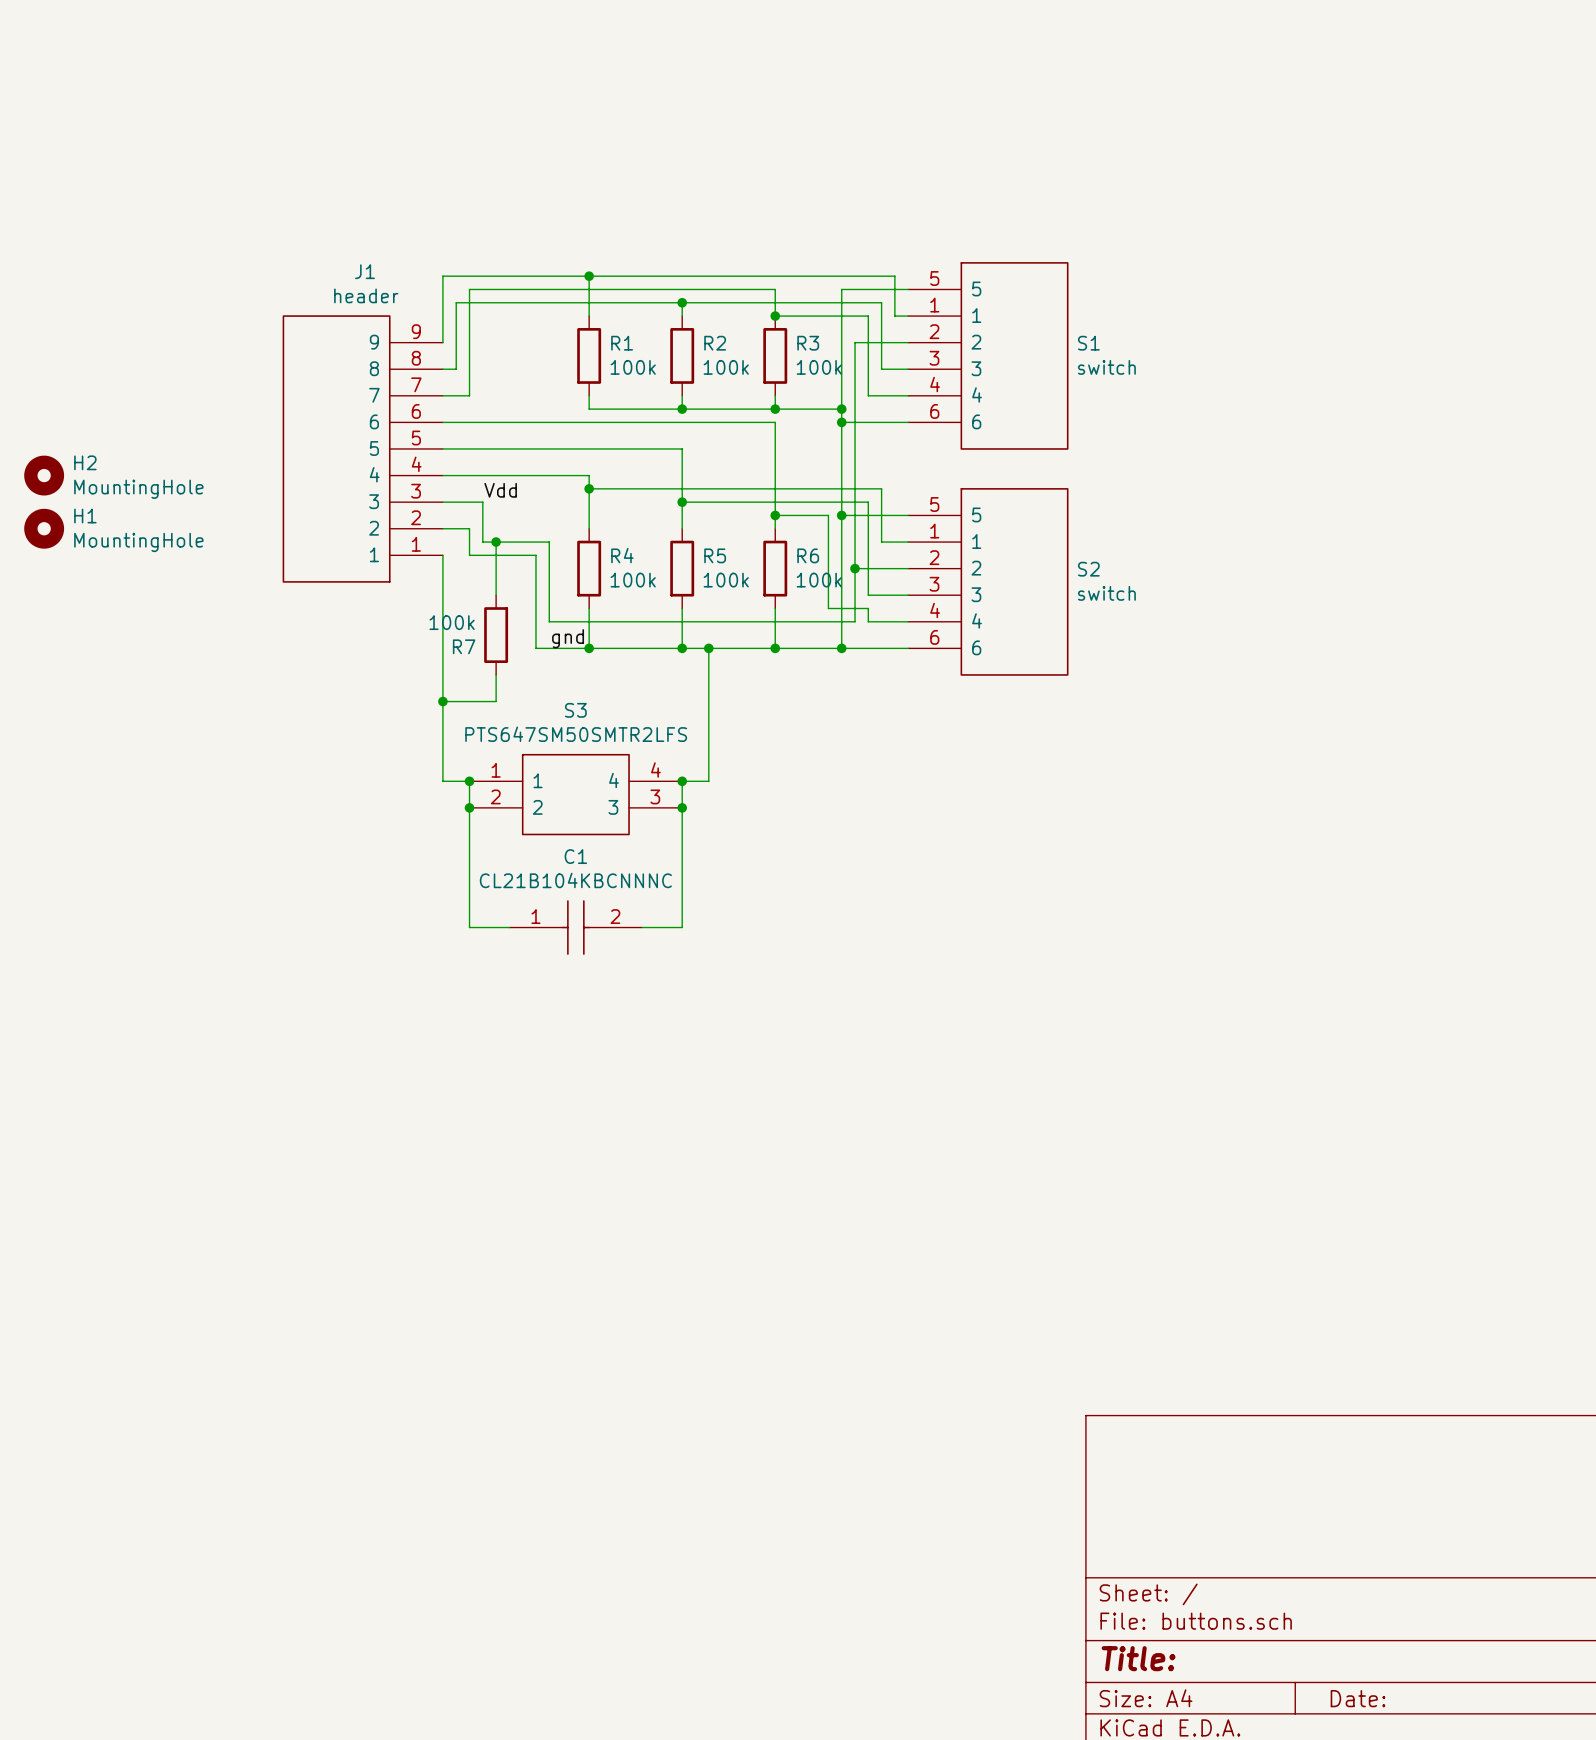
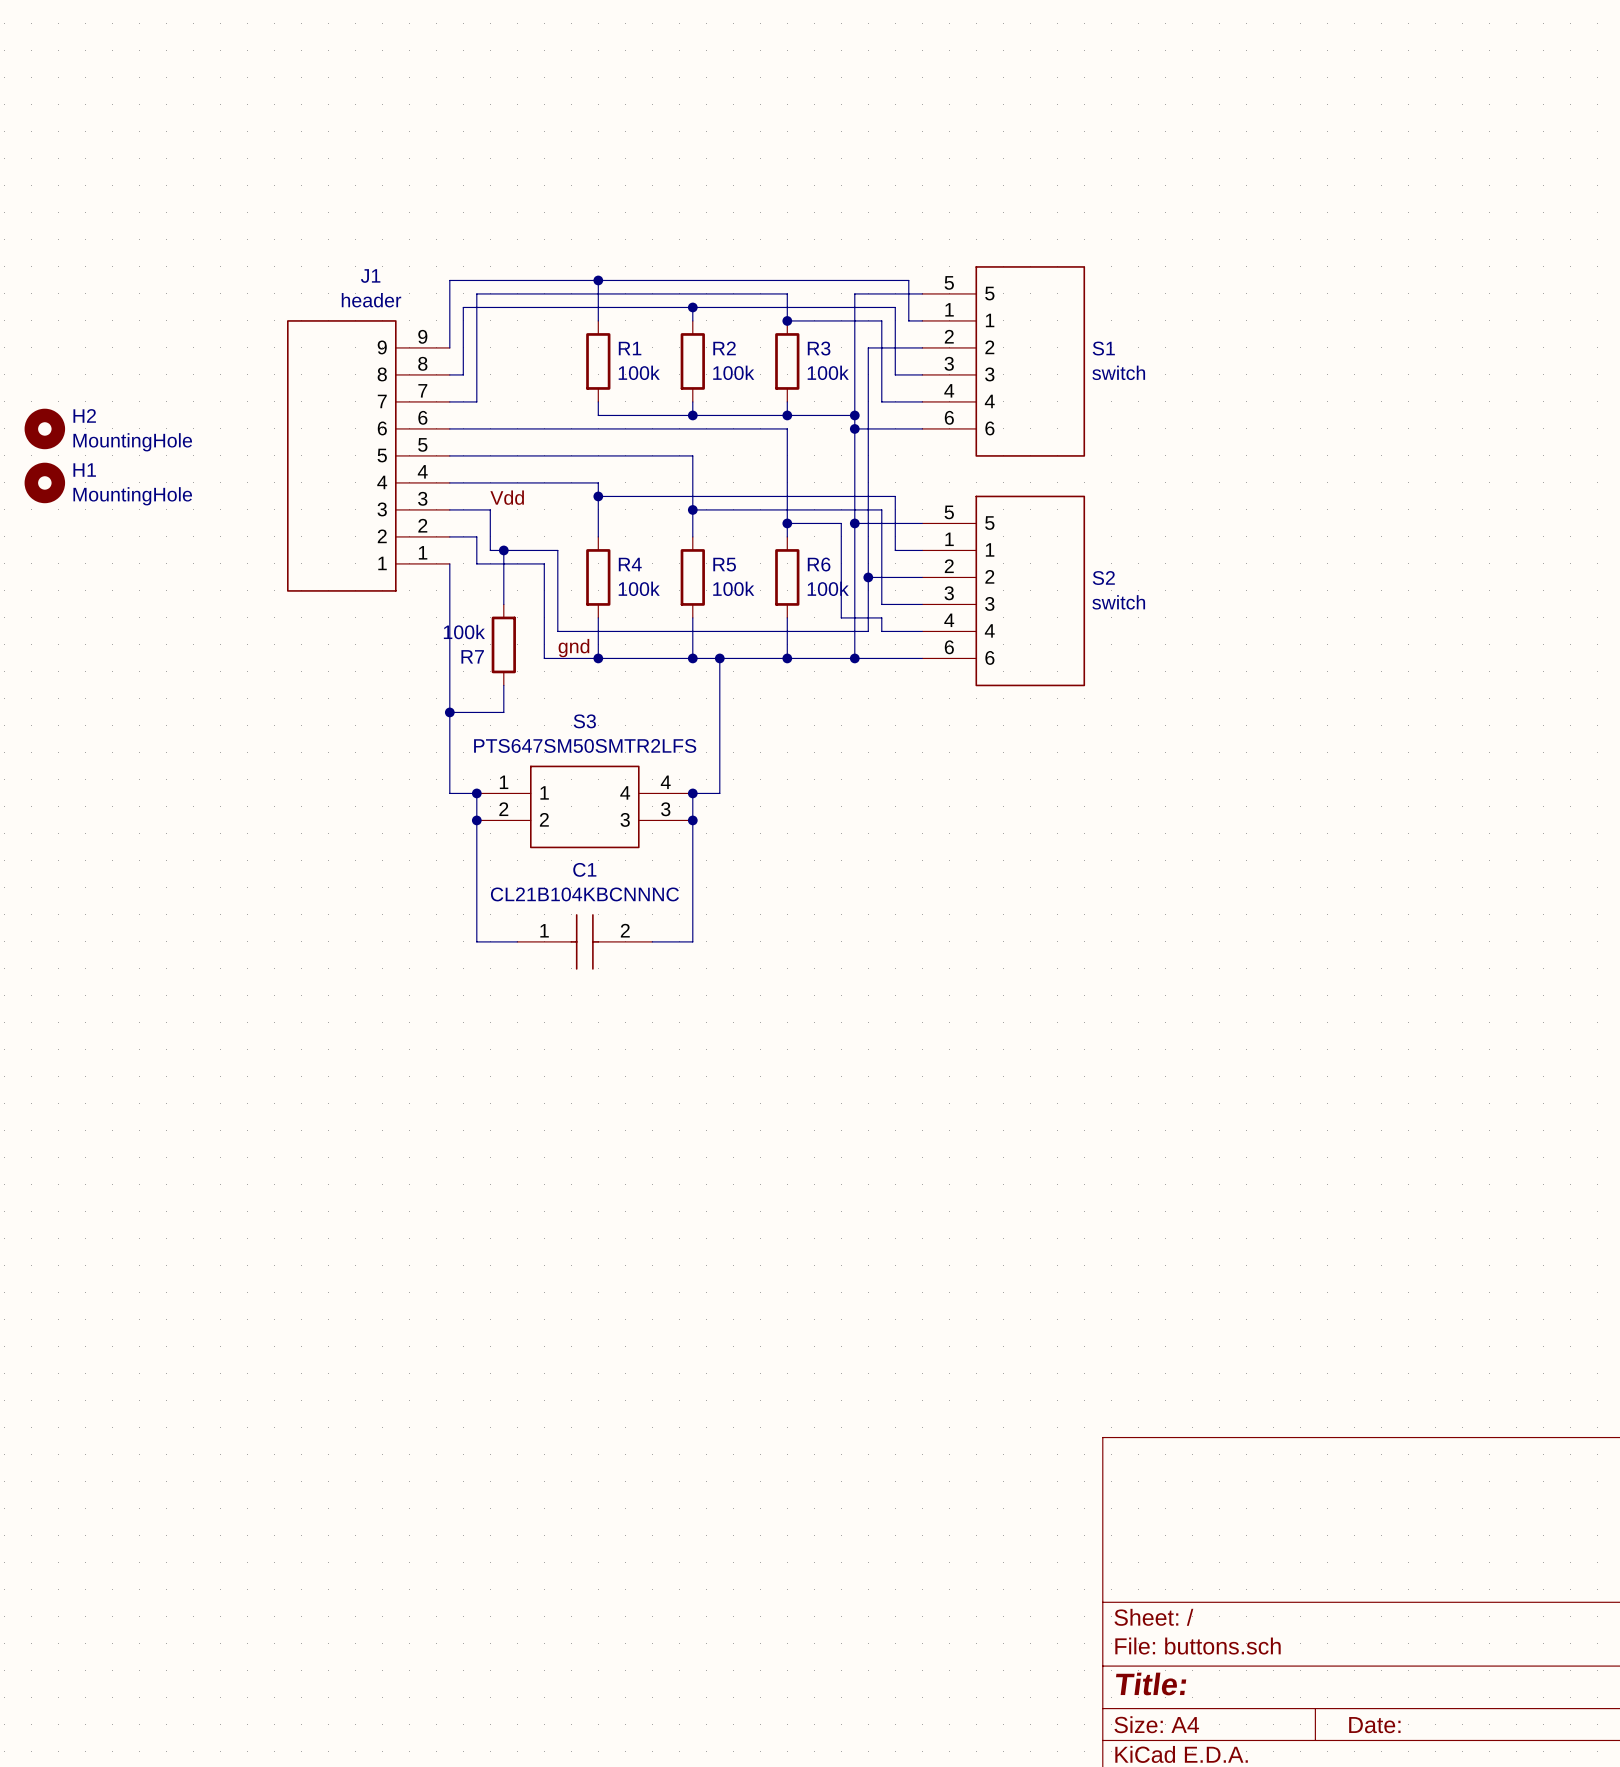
H2: none -> MountingHole (44, 428)
H2 name: H2 (85, 462) -> H1 (84, 470)
H1: MountingHole (44, 528) -> none

